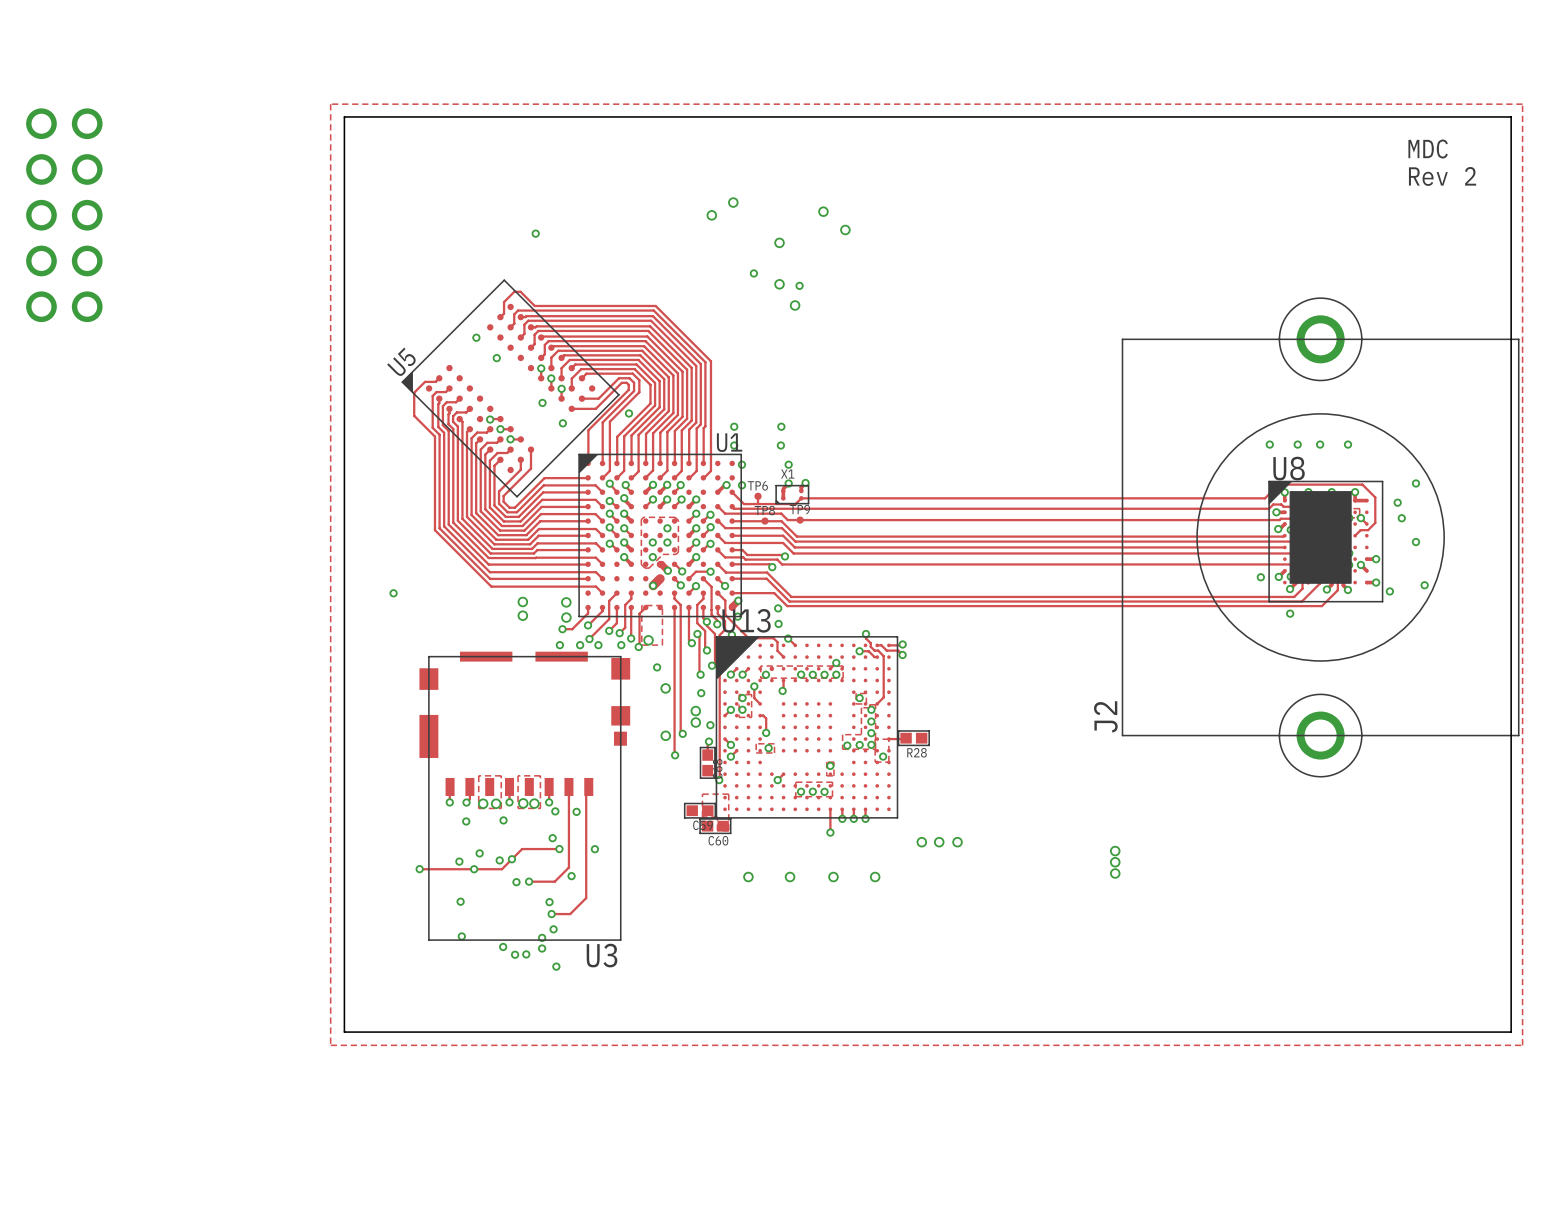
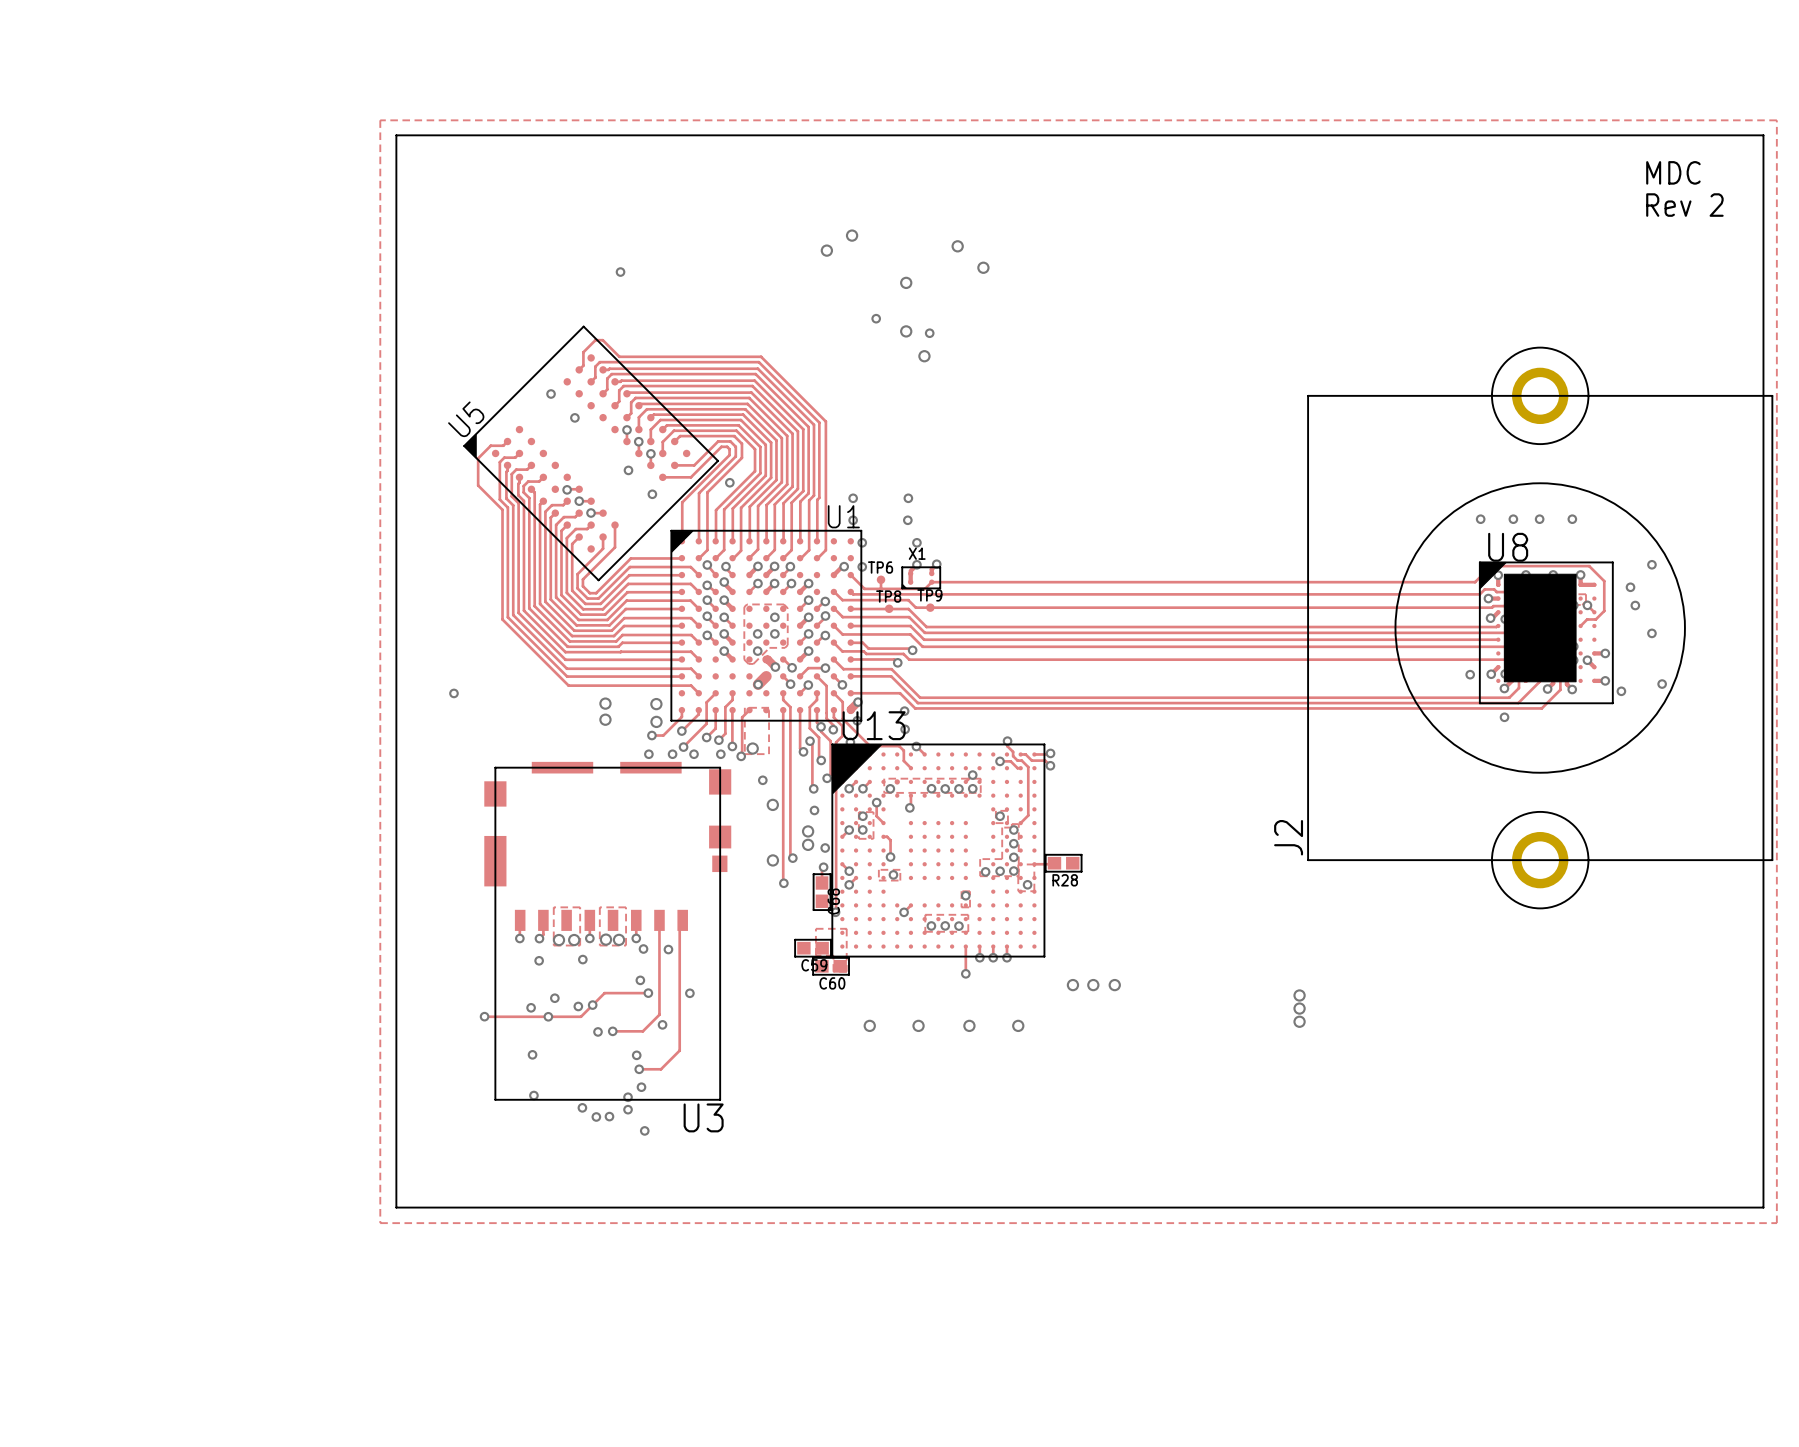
part: (64, 215) -> none

